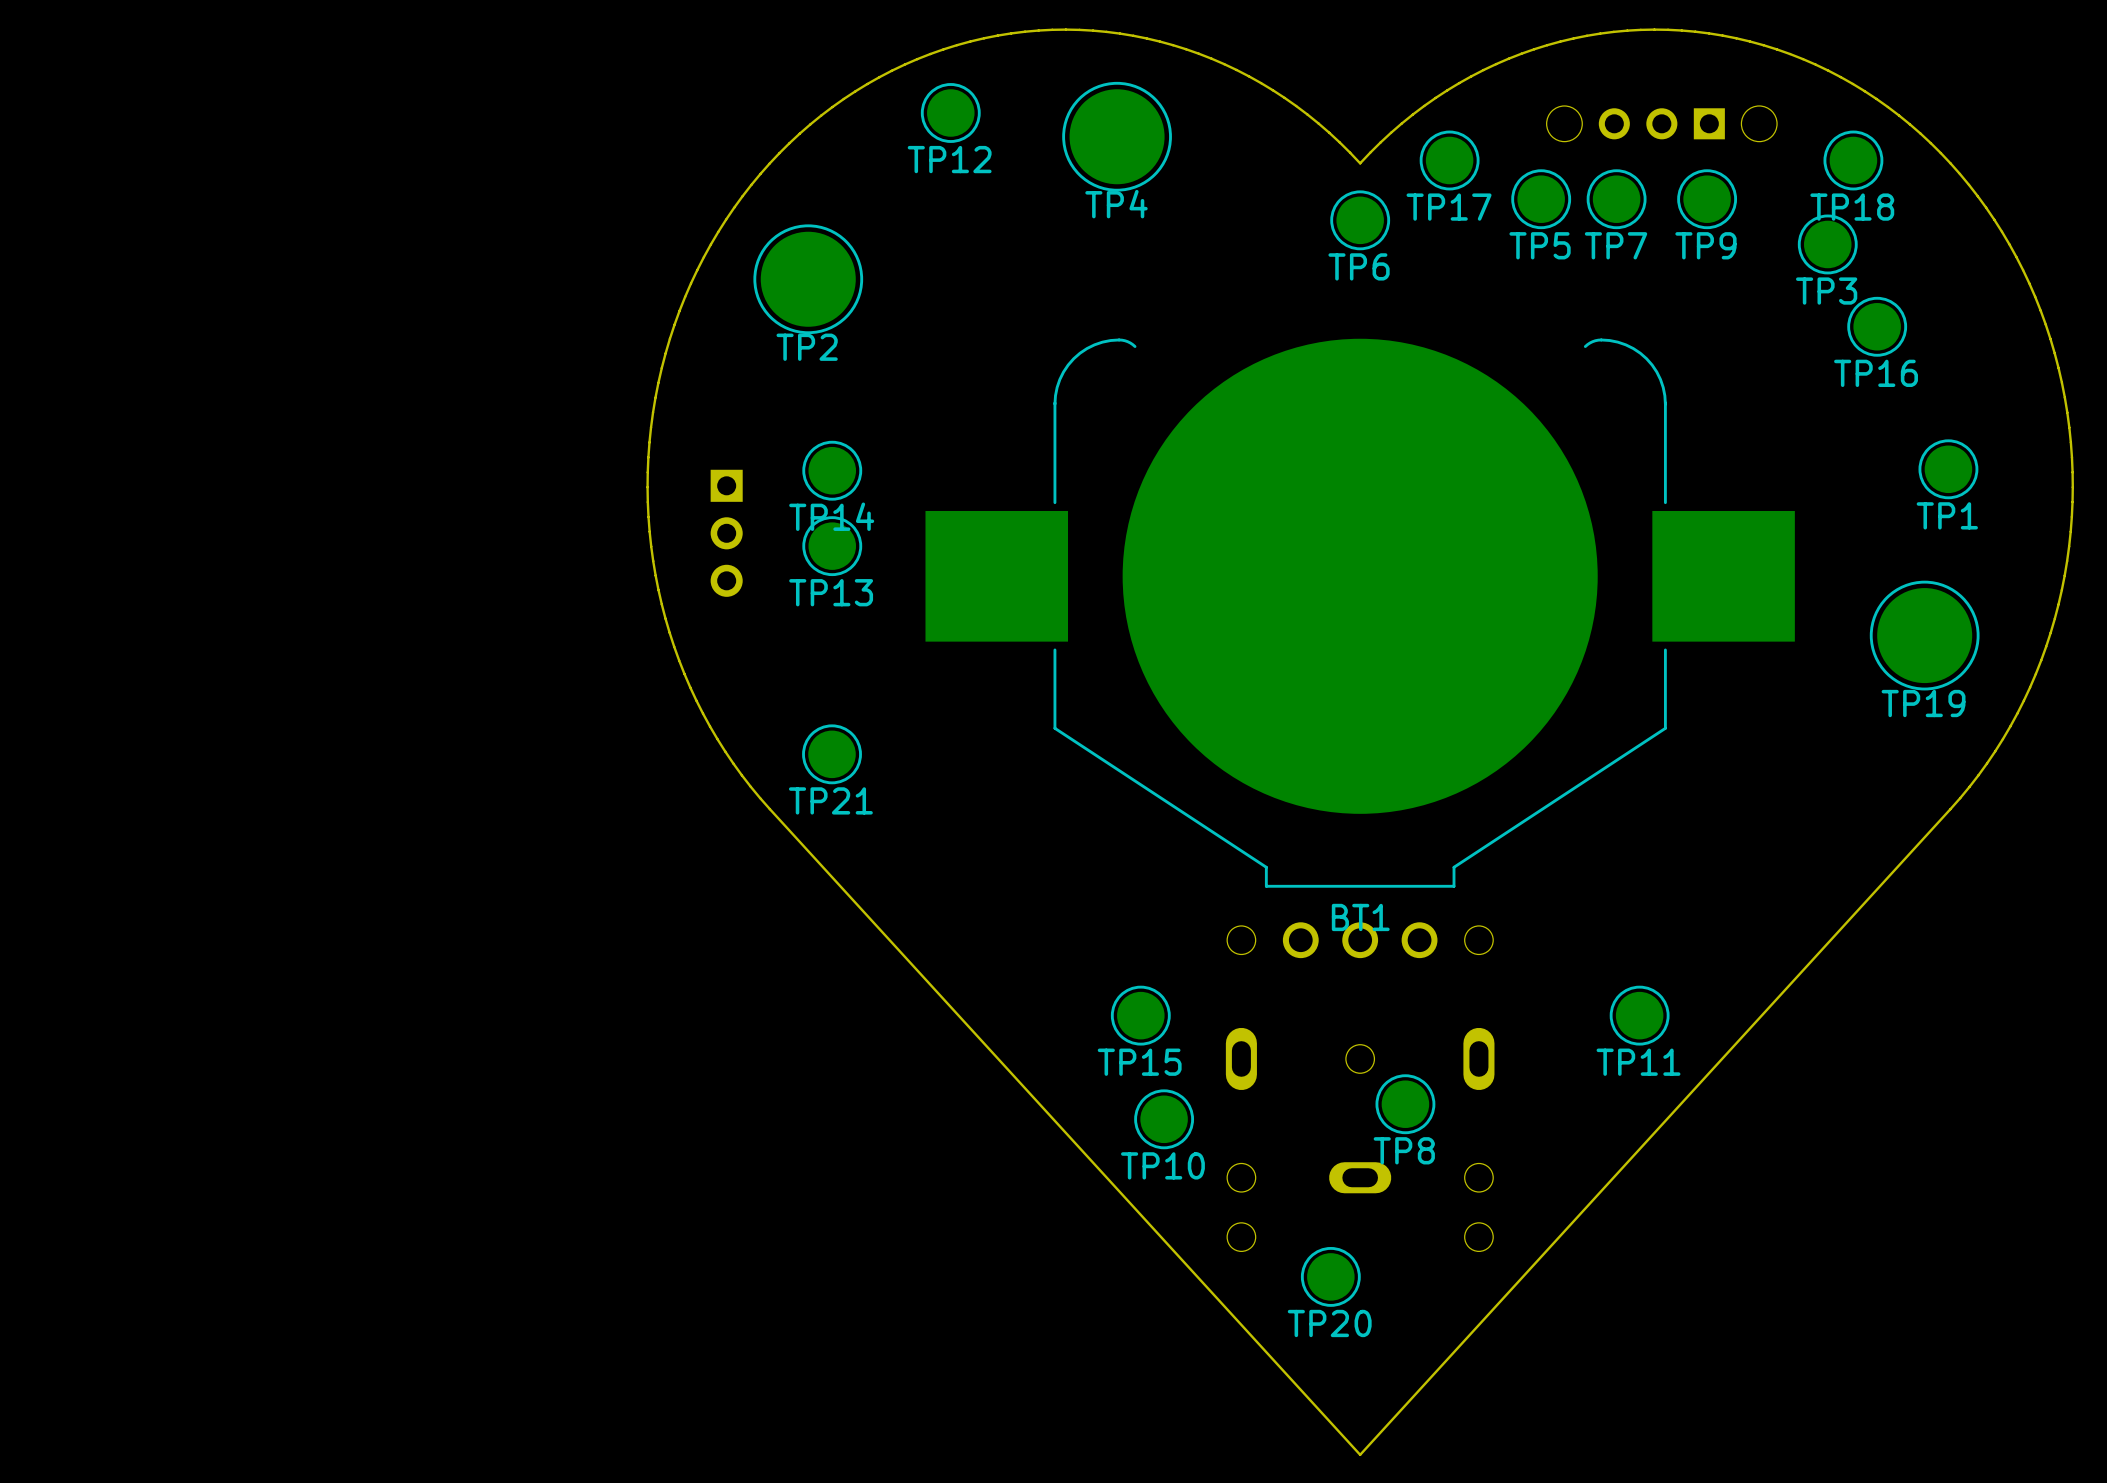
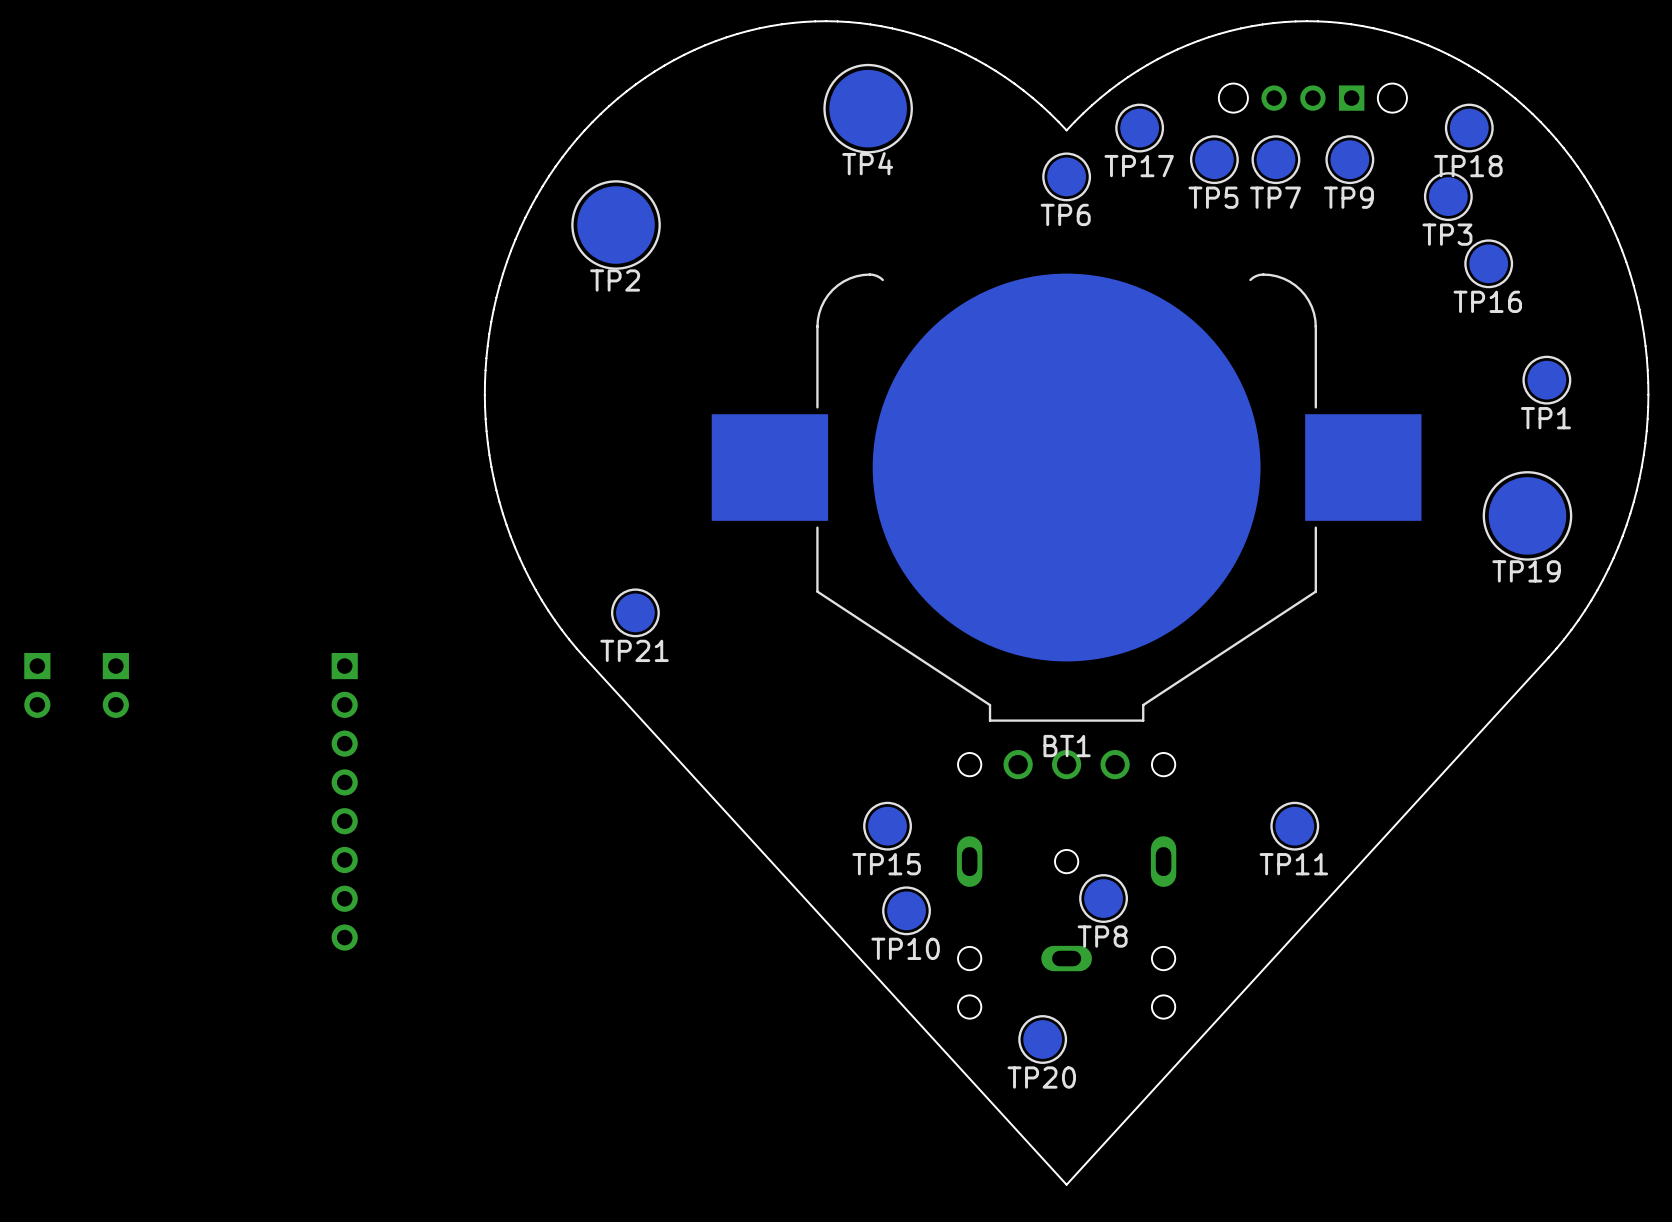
TP12: (950, 112) -> none
TP14: (832, 470) -> none
part: (726, 533) -> none
TP13: (832, 546) -> none
part: none -> (37, 685)
part: none -> (115, 685)
part: none -> (344, 801)

